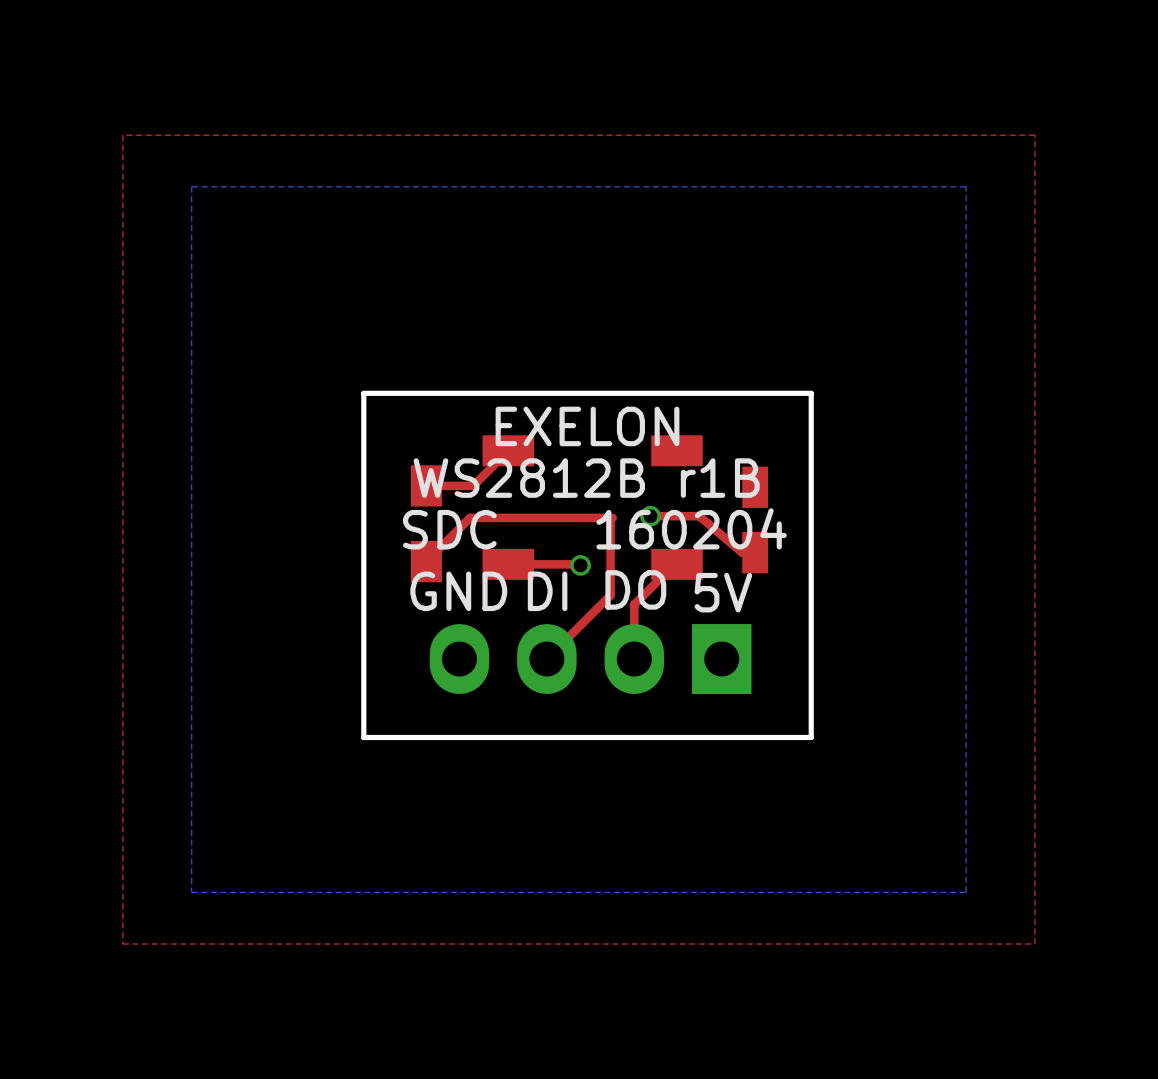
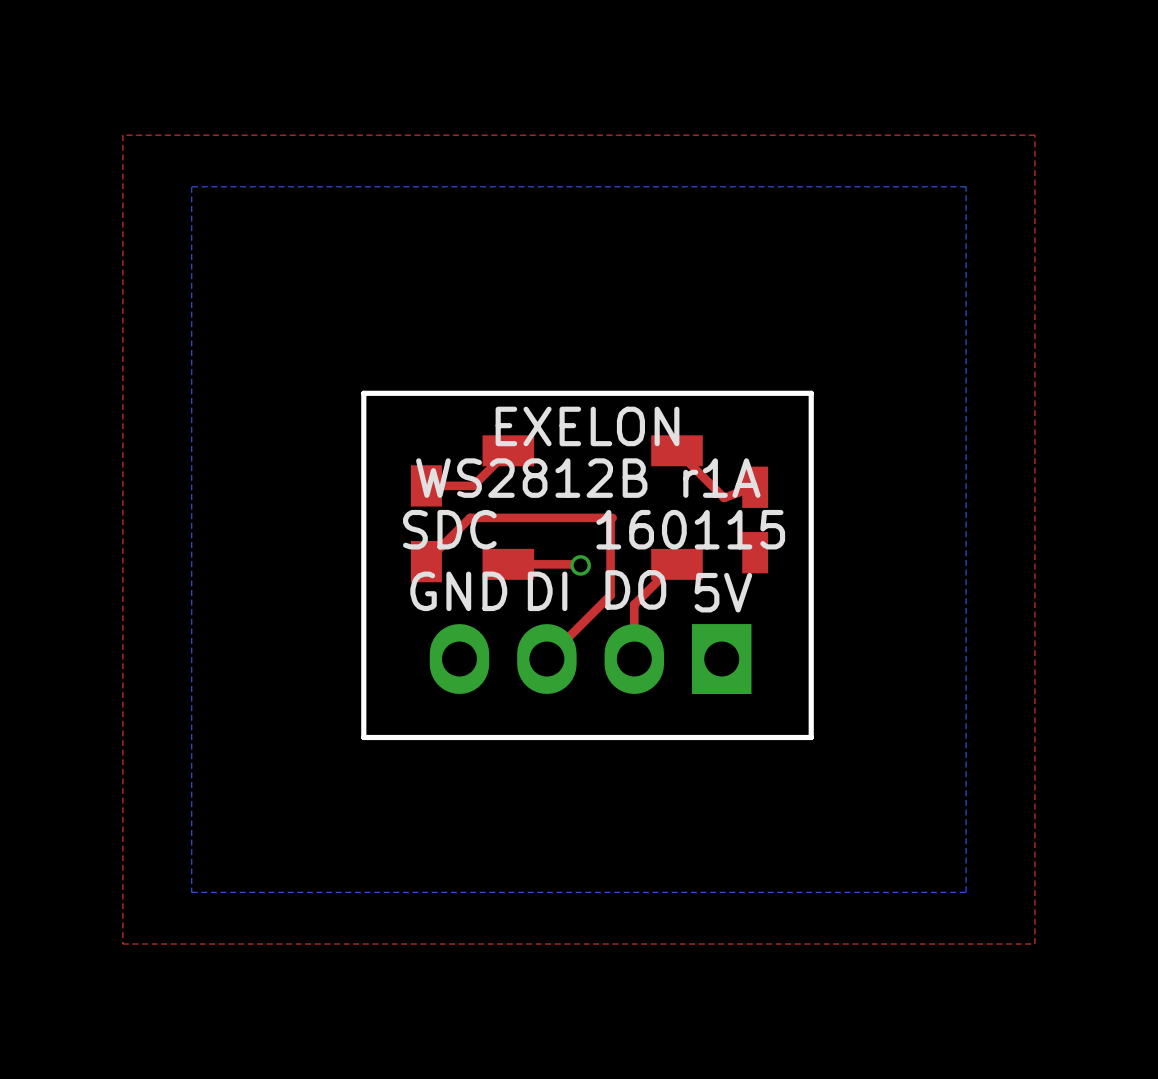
top track: none -> (677, 450) (724, 497) (750, 487)
text: WS2812B r1B (586, 478) -> WS2812B r1A (588, 478)
top track: (650, 516) (699, 516) (742, 552) (755, 552) -> none
via: (650, 516) -> none
text: 160204 (691, 528) -> 160115 (690, 529)

